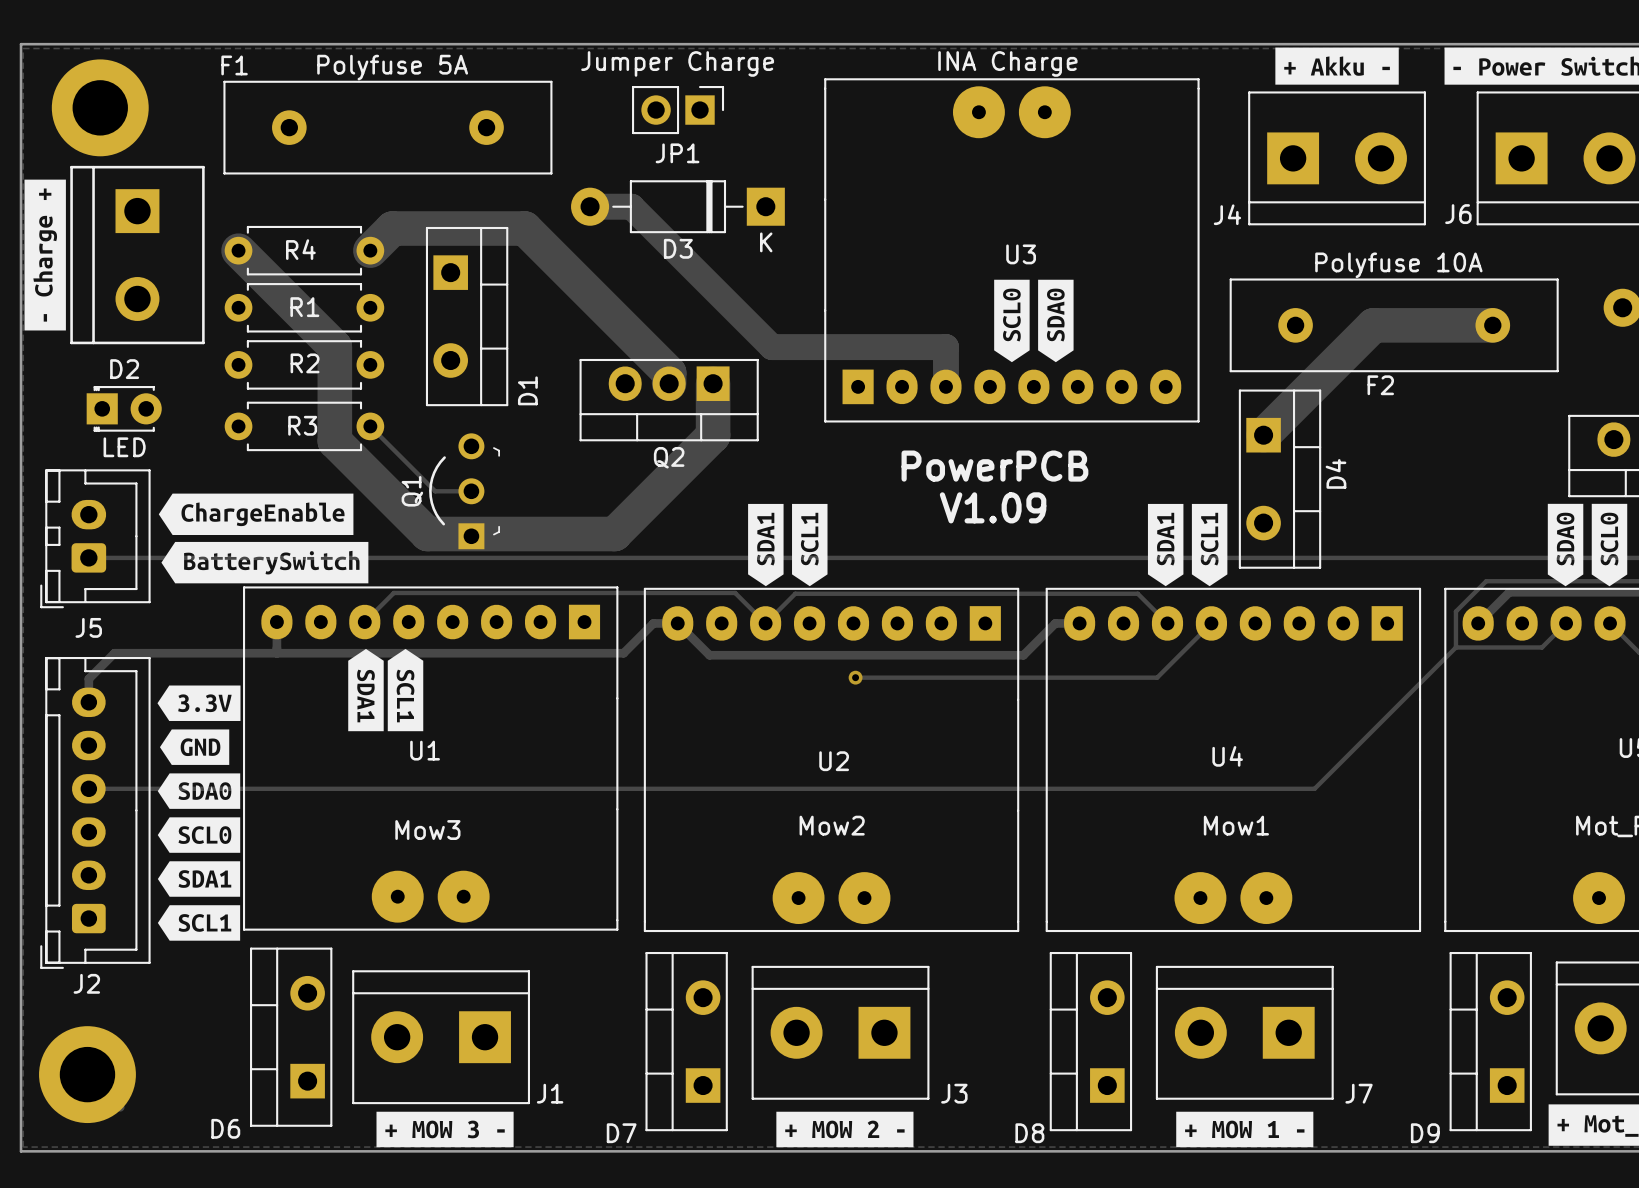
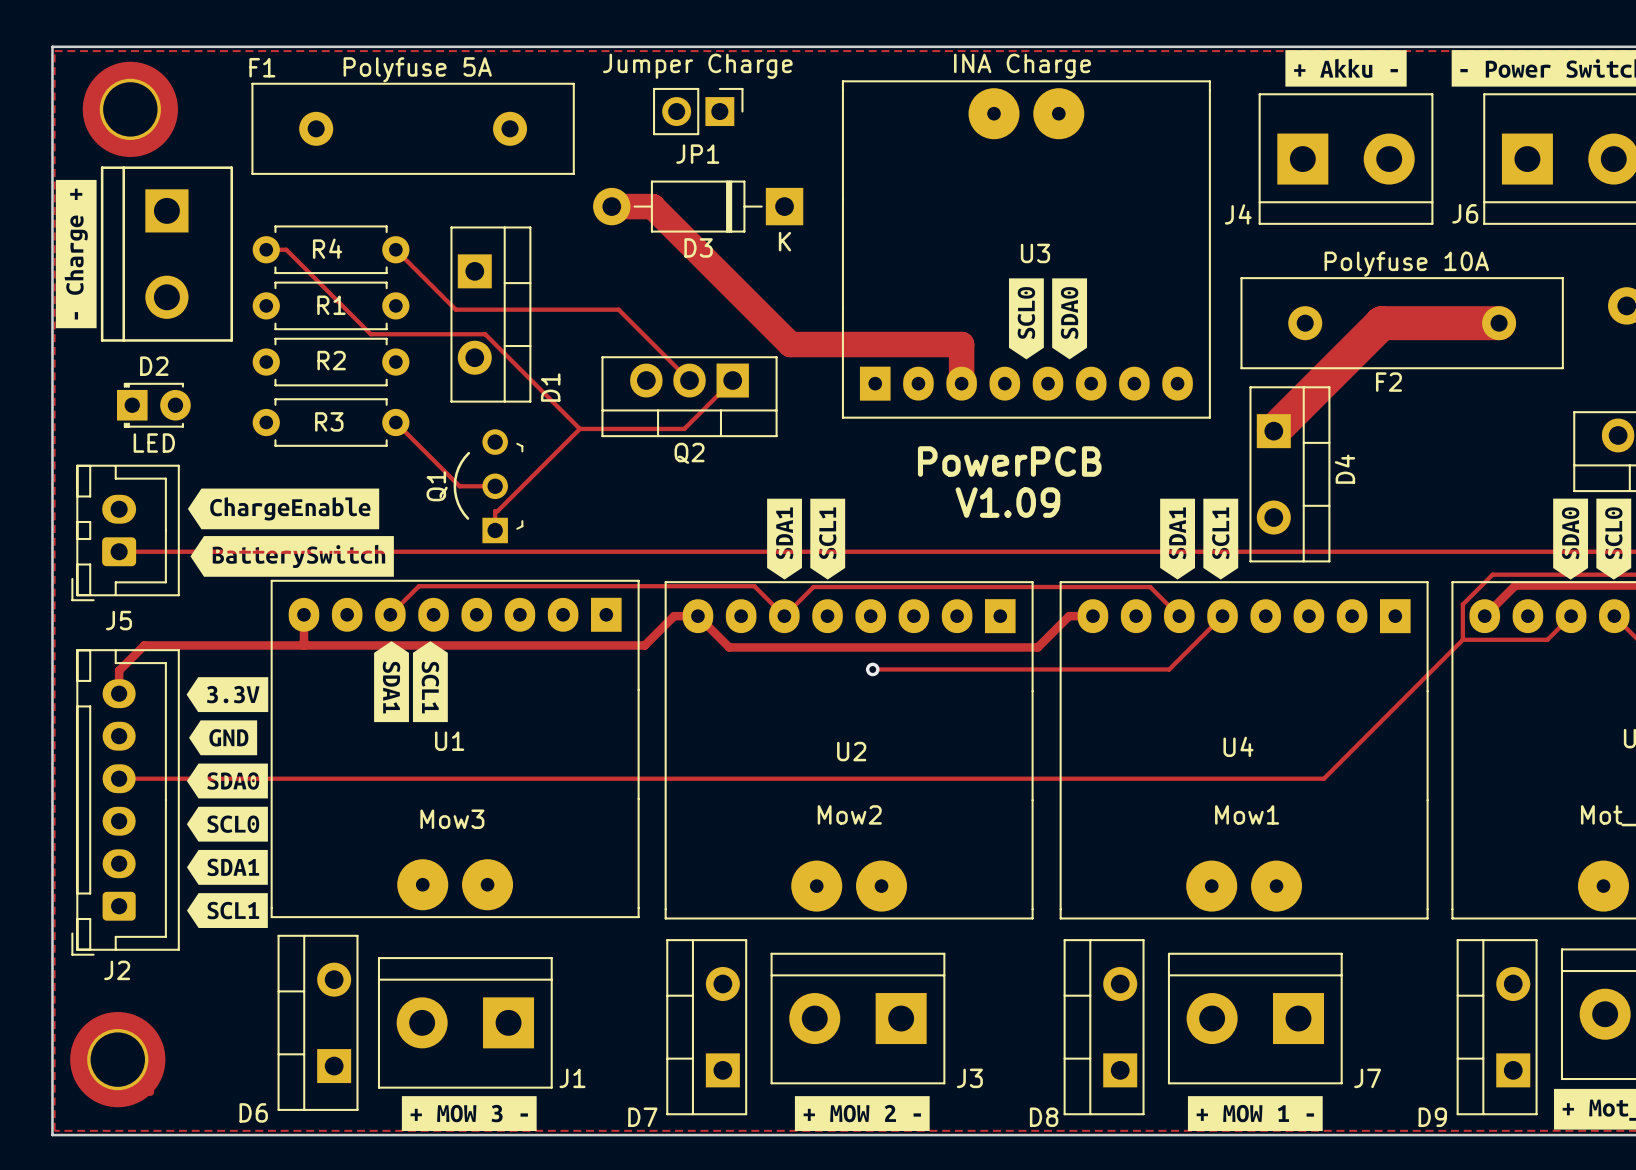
track: (238, 250) (334, 346) (334, 441) (427, 534) (614, 534) (713, 435) (713, 383) -> (266, 249) (286, 249) (370, 334) (485, 334) (579, 428)
track: (370, 250) (392, 228) (524, 228) (669, 372) (669, 383) -> (395, 249) (455, 309) (618, 309) (689, 380)
track: none -> (732, 380) (684, 428) (579, 428)
track: none -> (579, 428) (497, 511) (495, 511) (495, 530)

